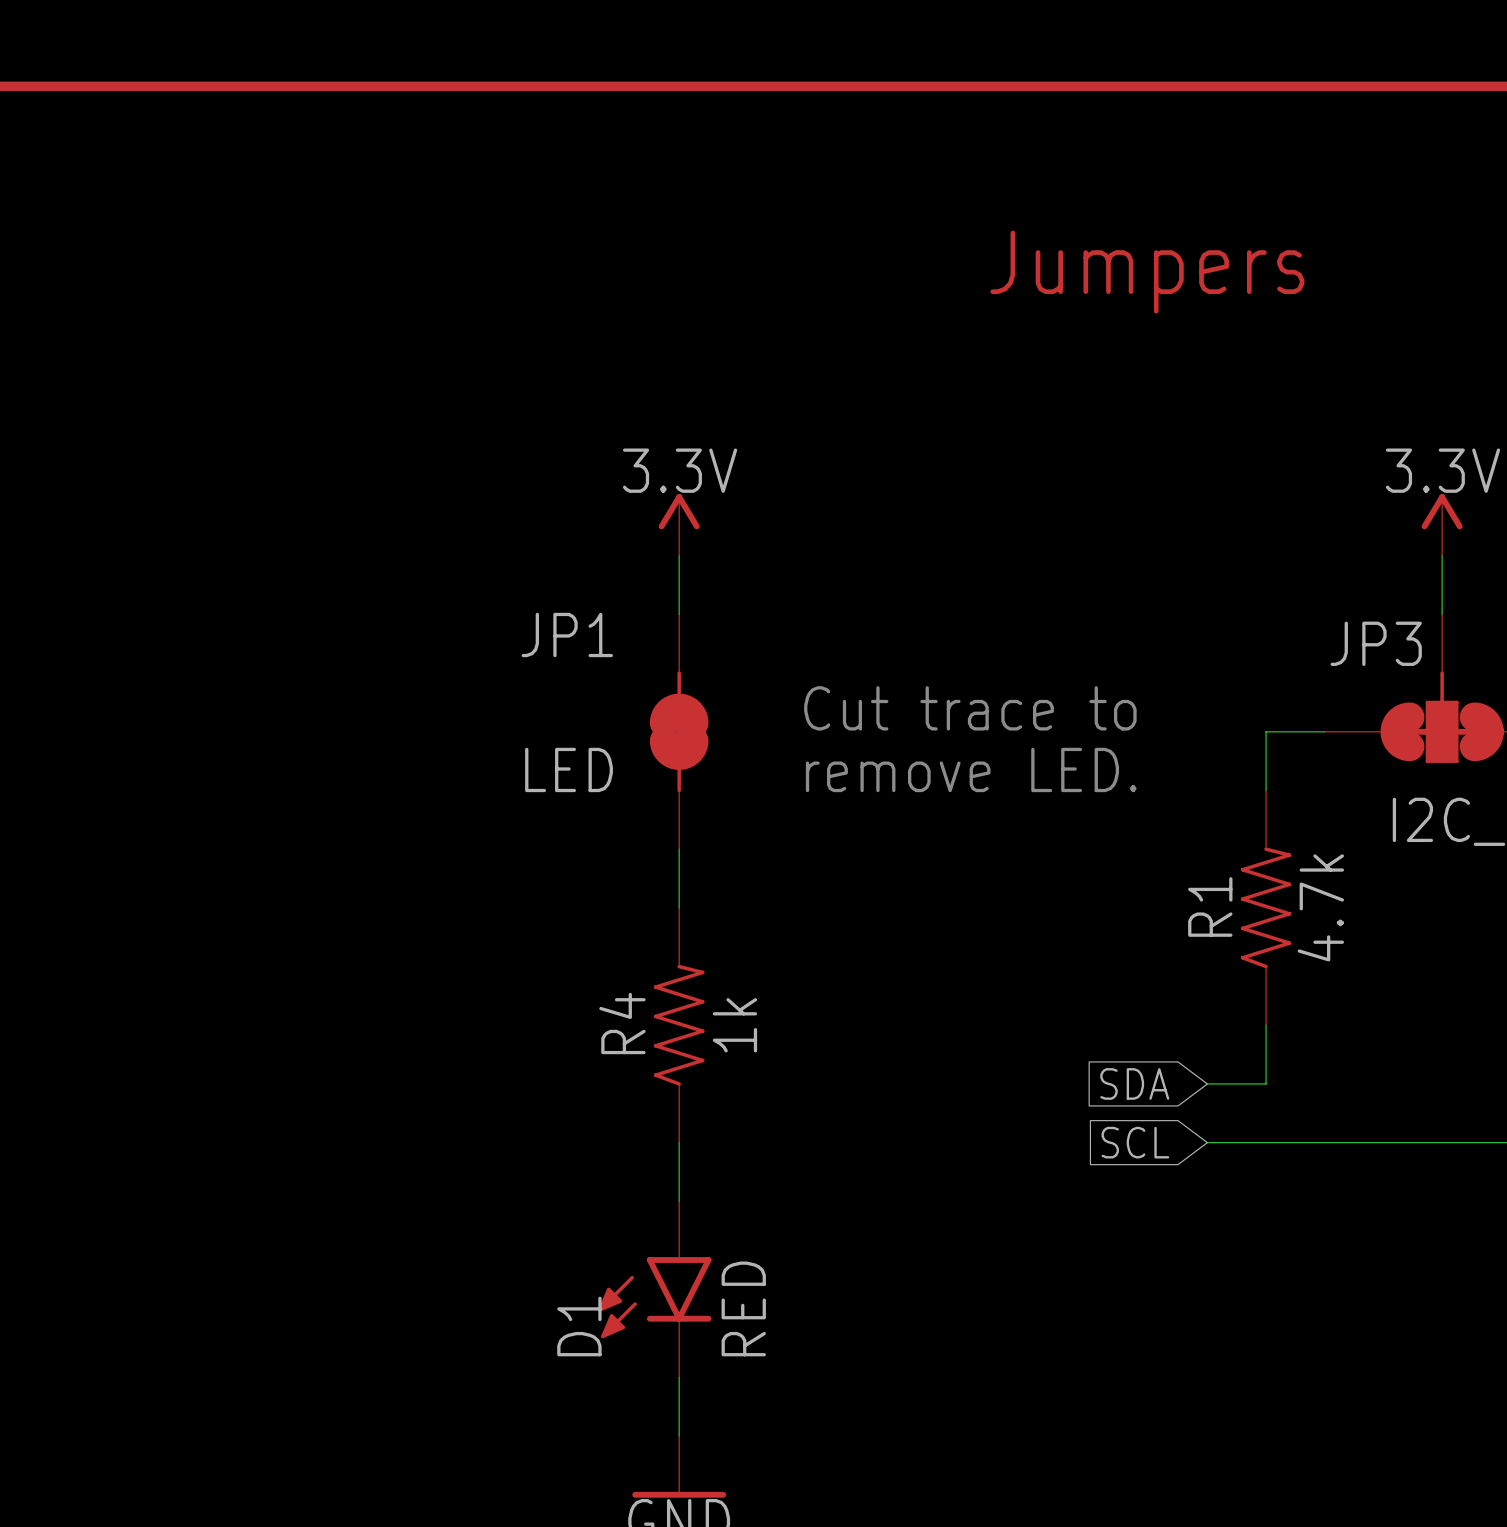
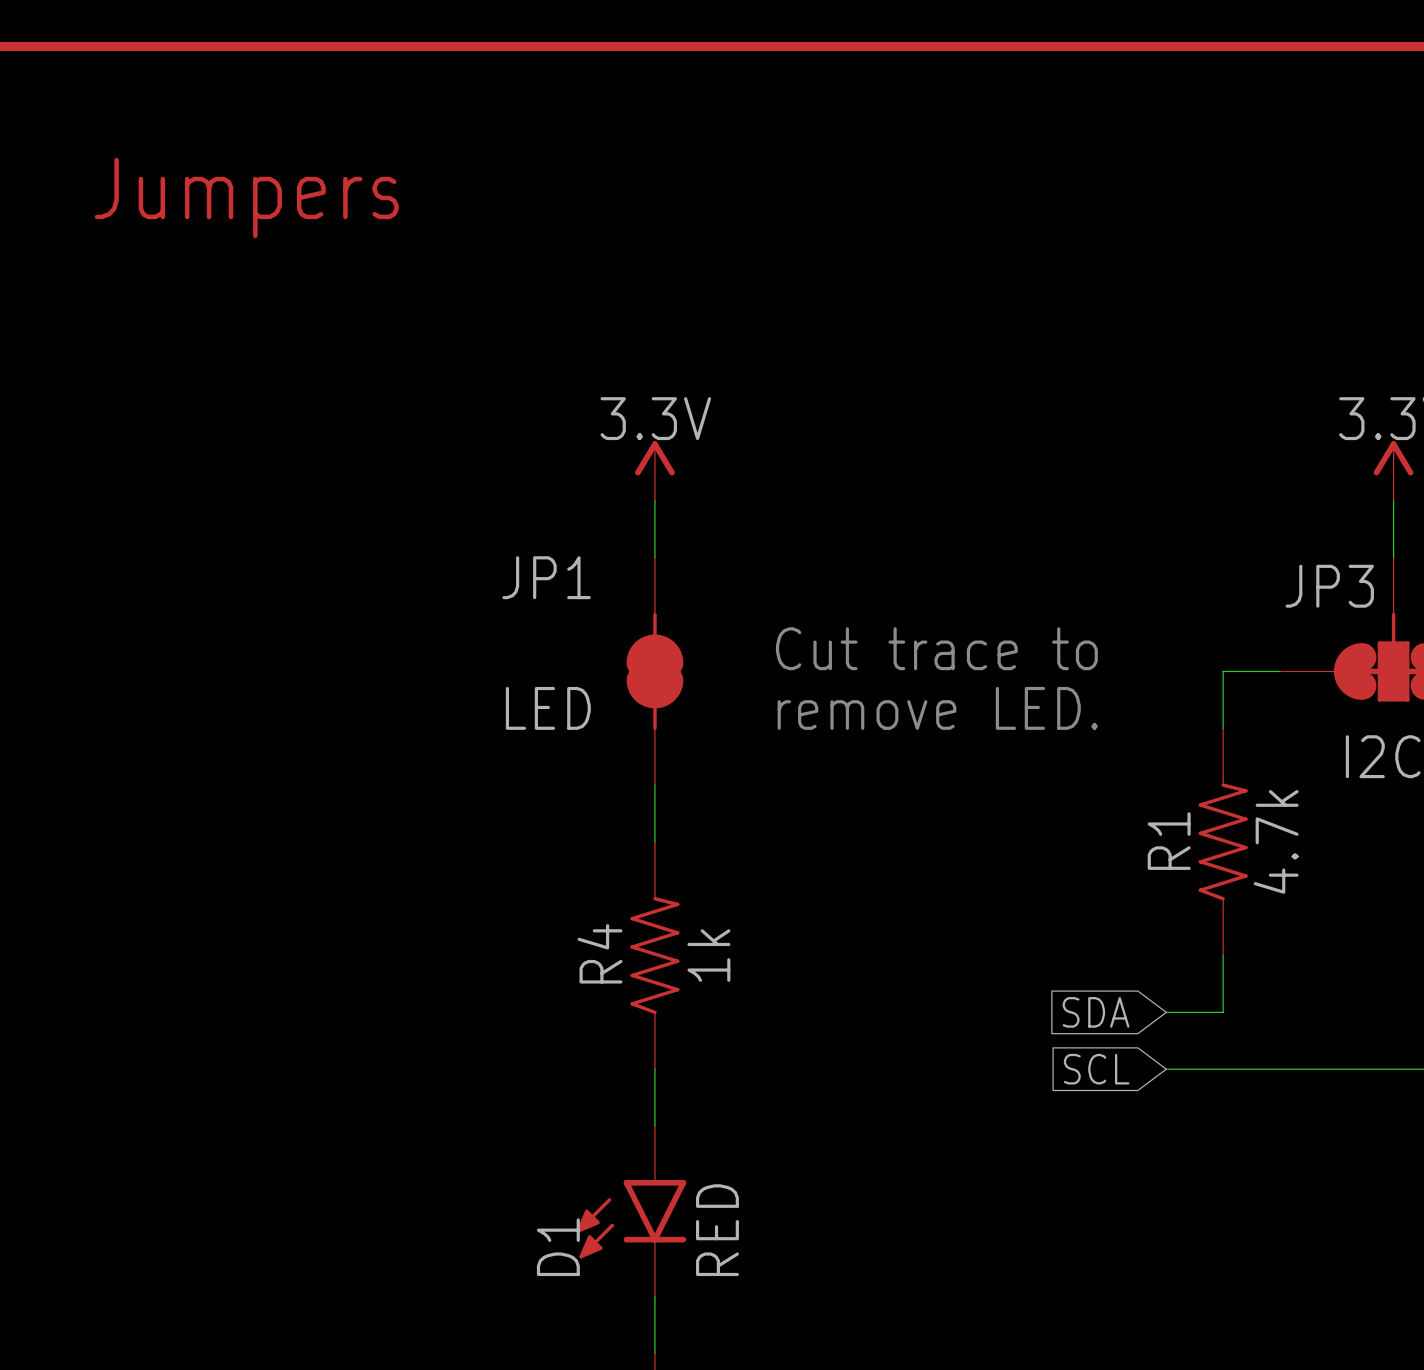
text: none -> Jumpers (246, 197)
text: Jumpers (1147, 272) -> none

